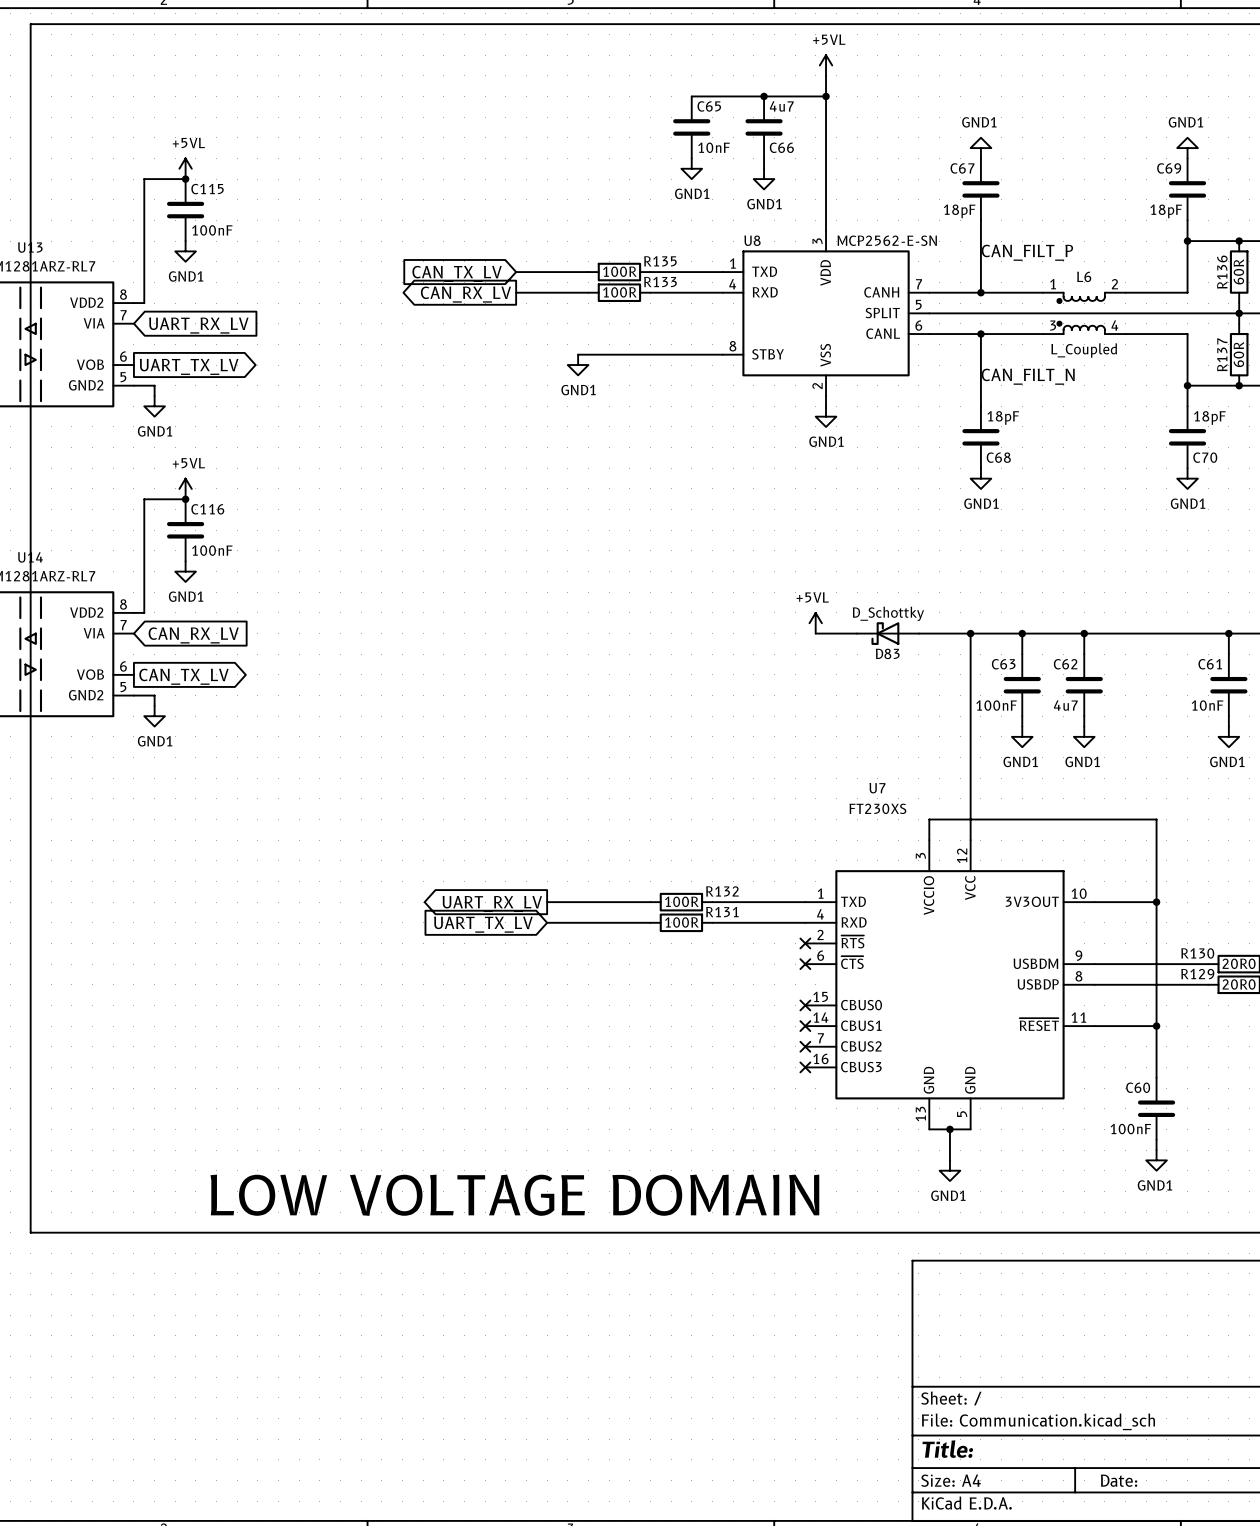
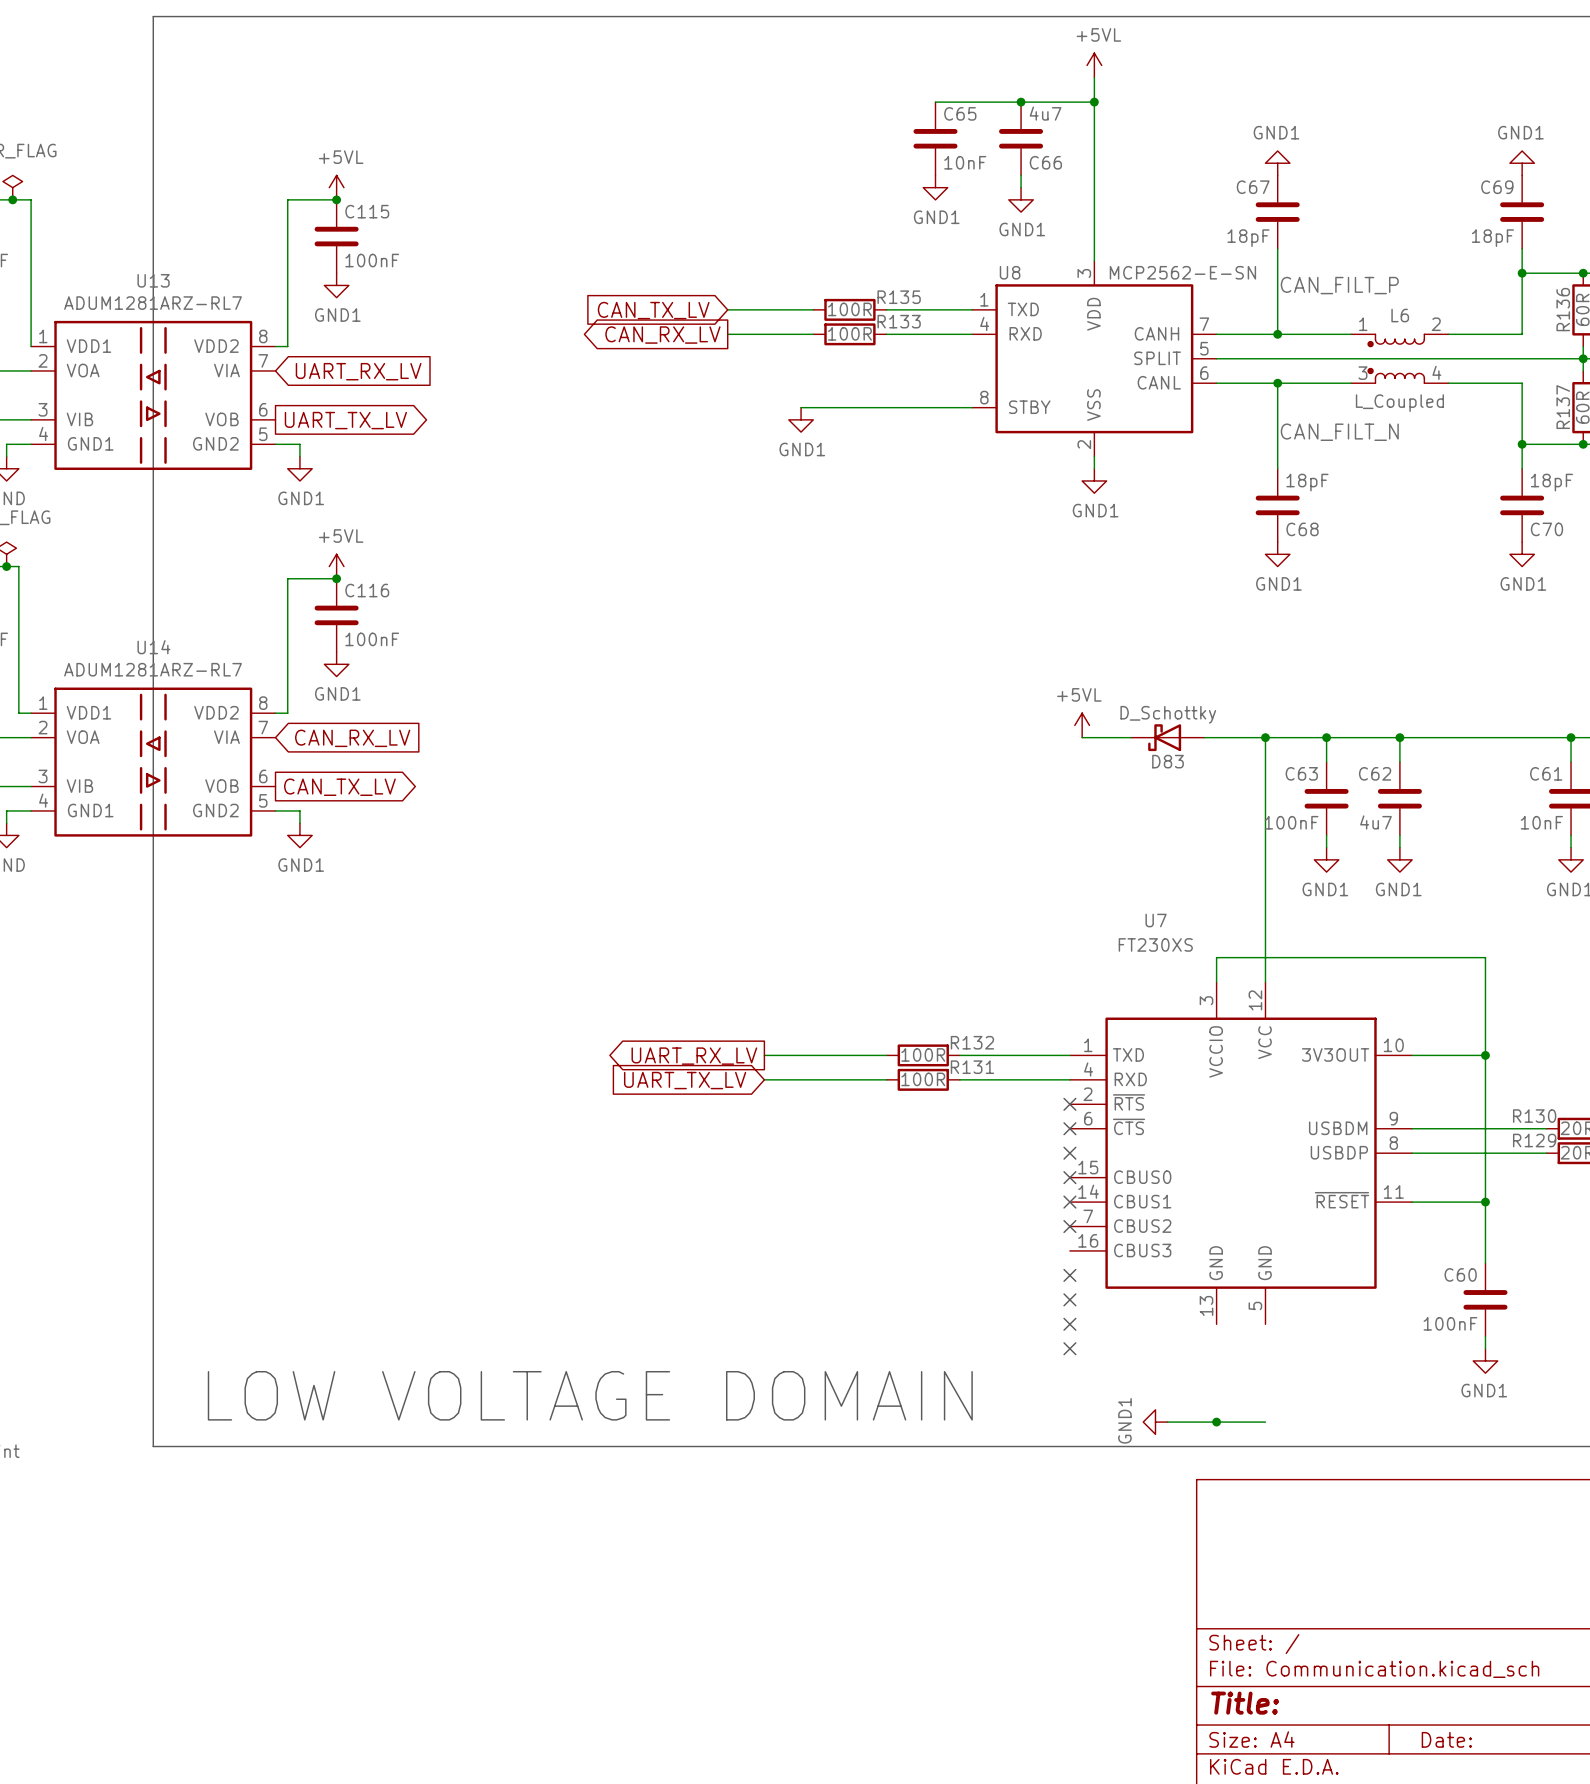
no-connect mark: none -> (1069, 1153)
no-connect mark: (805, 1067) -> none
no-connect mark: none -> (1069, 1275)
no-connect mark: none -> (1069, 1299)
no-connect mark: none -> (1069, 1324)
wire: (929, 1129) (970, 1129) -> none
wire: (949, 1129) (949, 1160) -> none
junction: (949, 1129) -> none
no-connect mark: none -> (1069, 1348)
power symbol rotation: 0° (949, 1170) -> 90° clockwise (1155, 1422)
power symbol position: GND1 (949, 1170) -> GND1 (1155, 1422)
text position: LOW VOLTAGE DOMAIN (514, 1195) -> LOW VOLTAGE DOMAIN (590, 1395)
wire: none -> (1167, 1422) (1265, 1422)
junction: none -> (1216, 1422)

